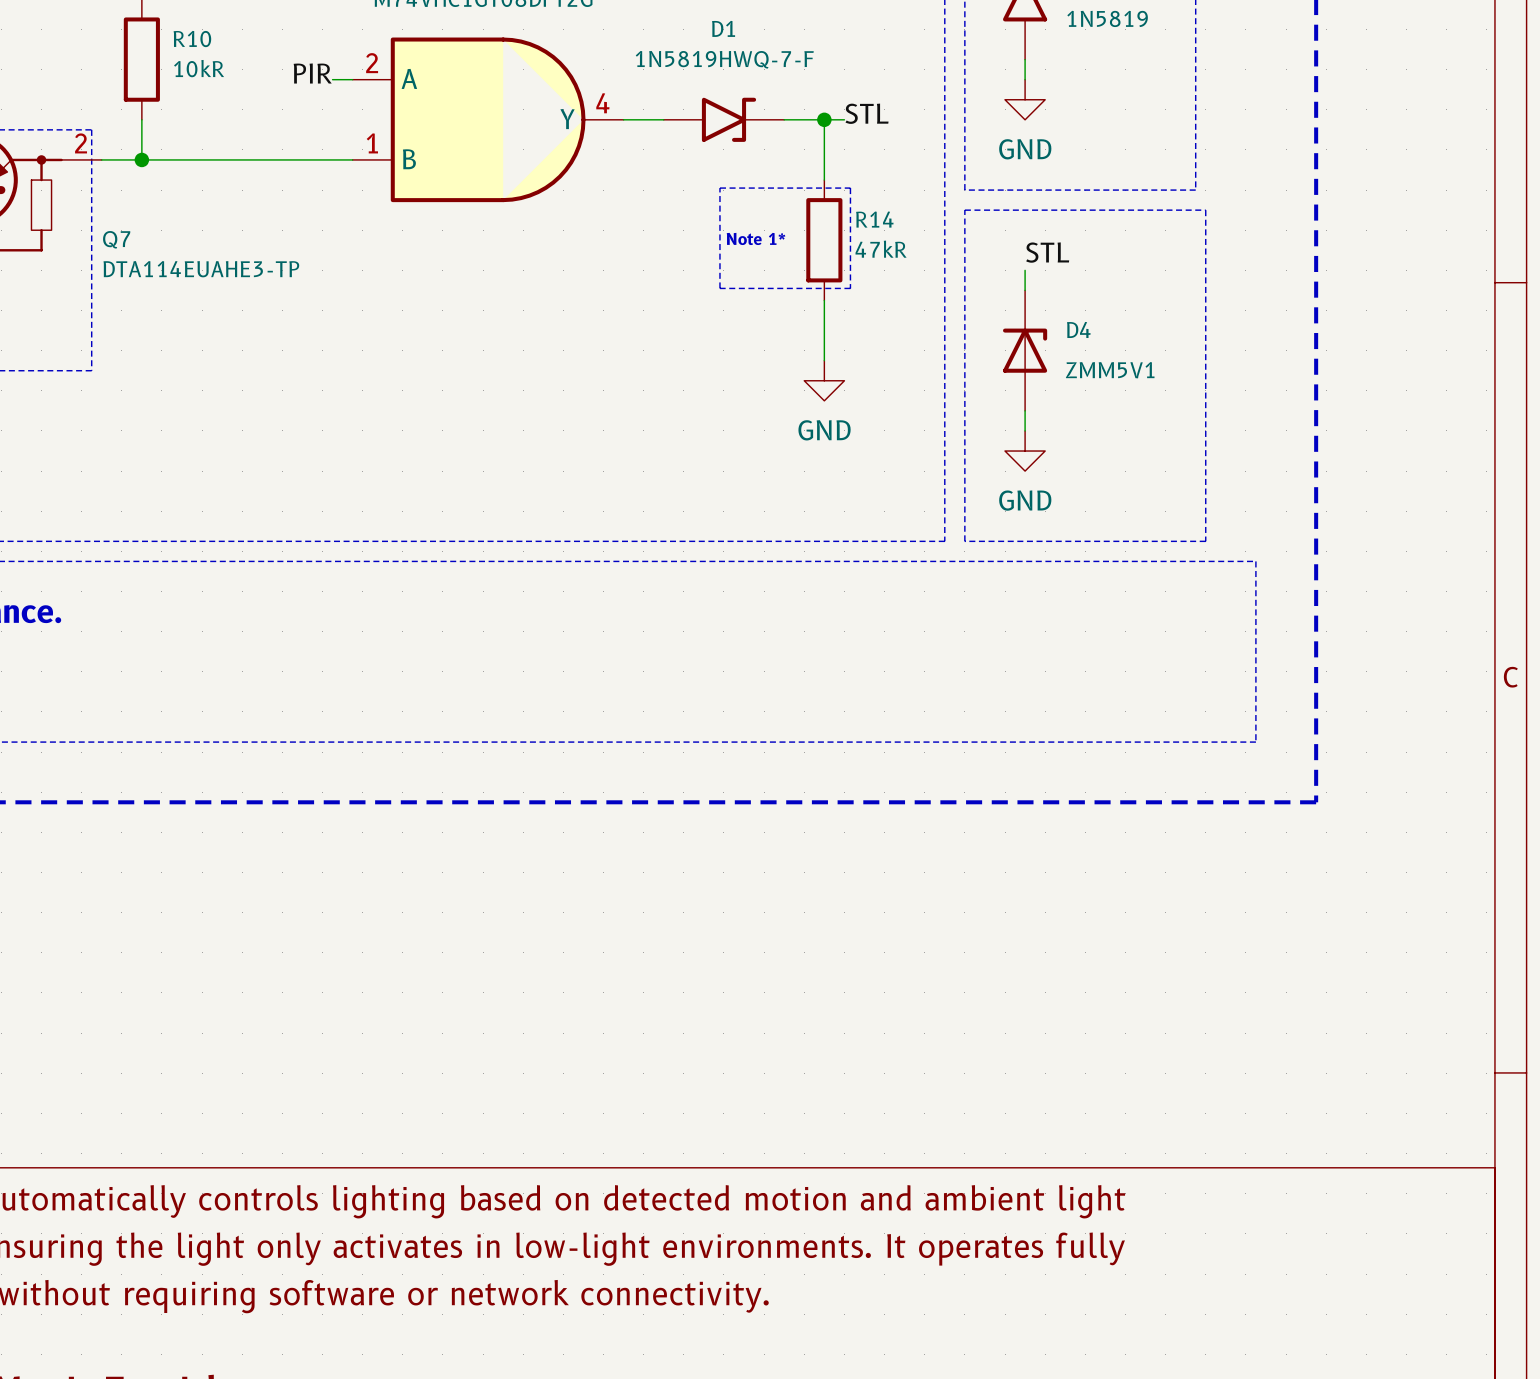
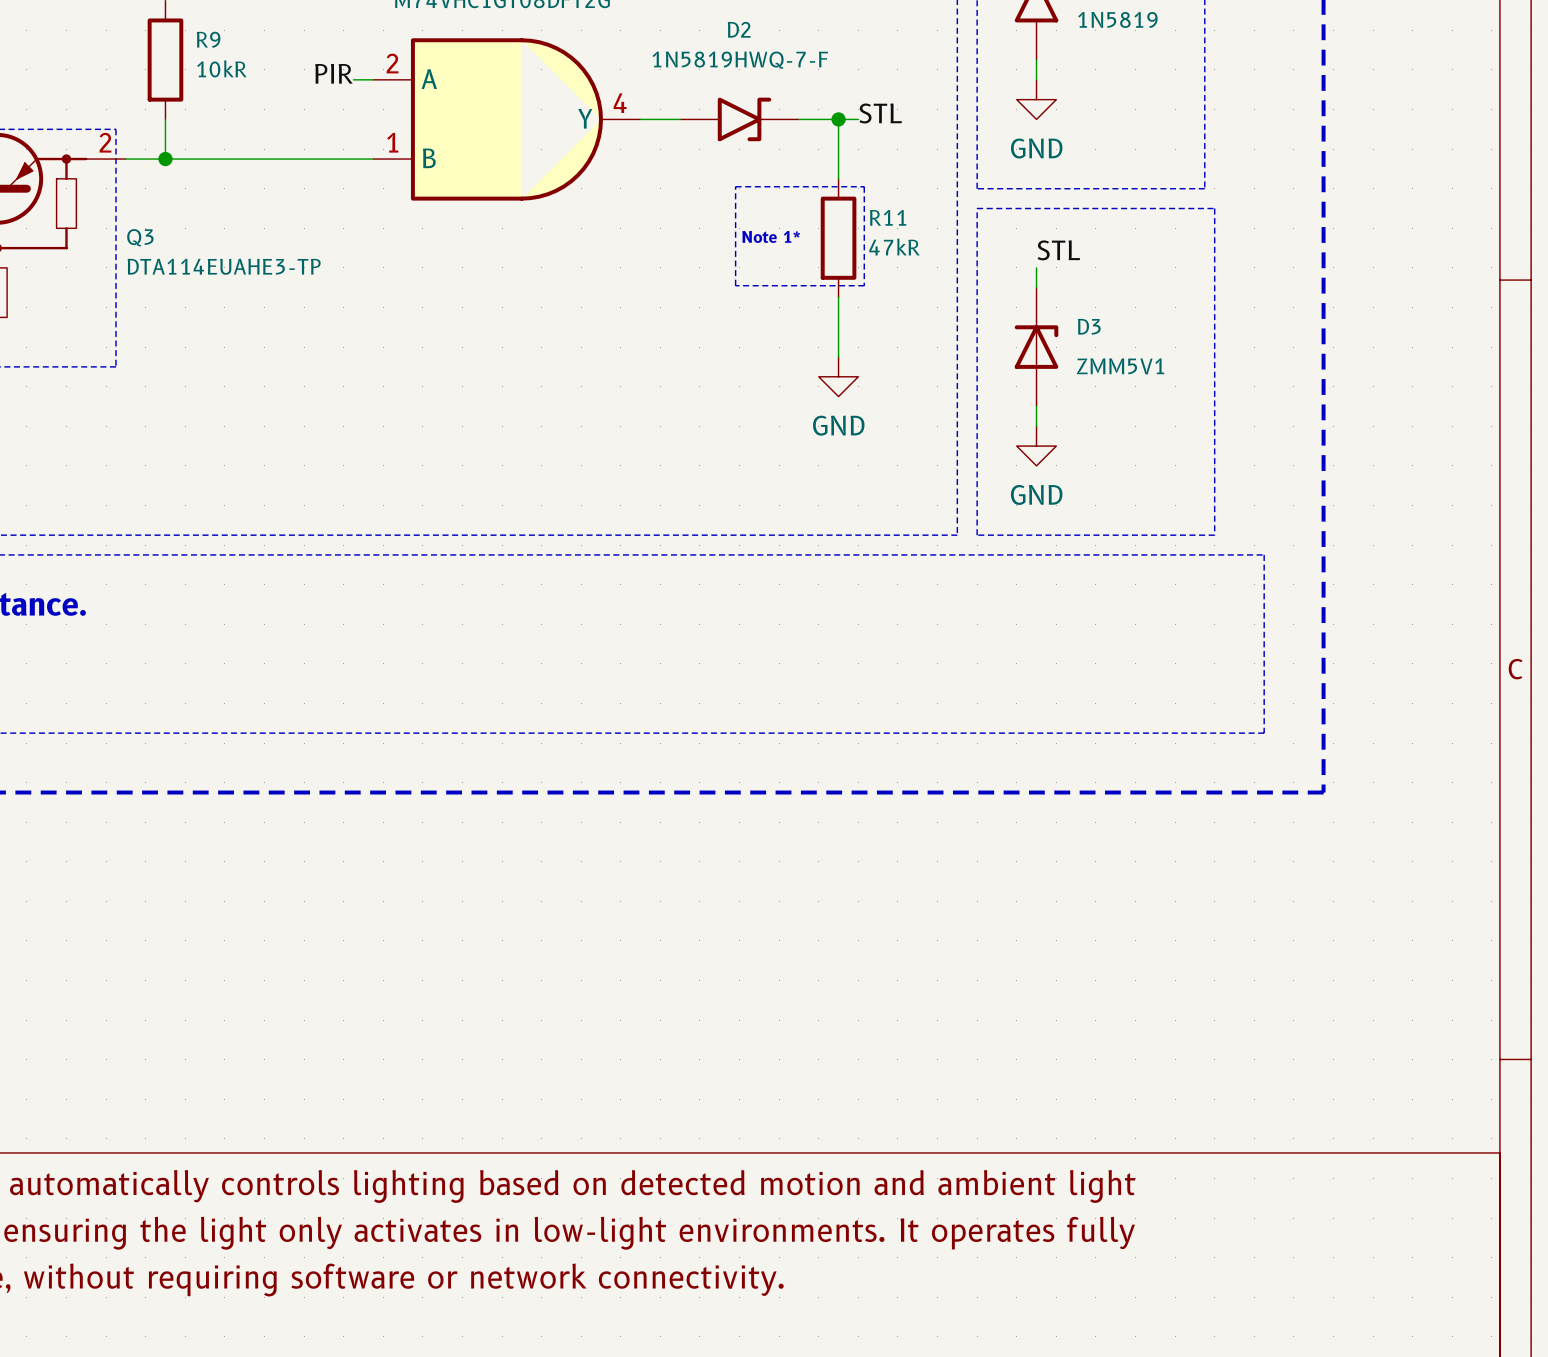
D1 name: D1 (723, 28) -> D2 (739, 29)
R10 name: R10 (192, 39) -> R9 (208, 39)
R14 name: R14 (874, 219) -> R11 (888, 217)
Q7 name: Q7 (116, 239) -> Q3 (140, 237)
D4 name: D4 (1078, 329) -> D3 (1089, 326)

